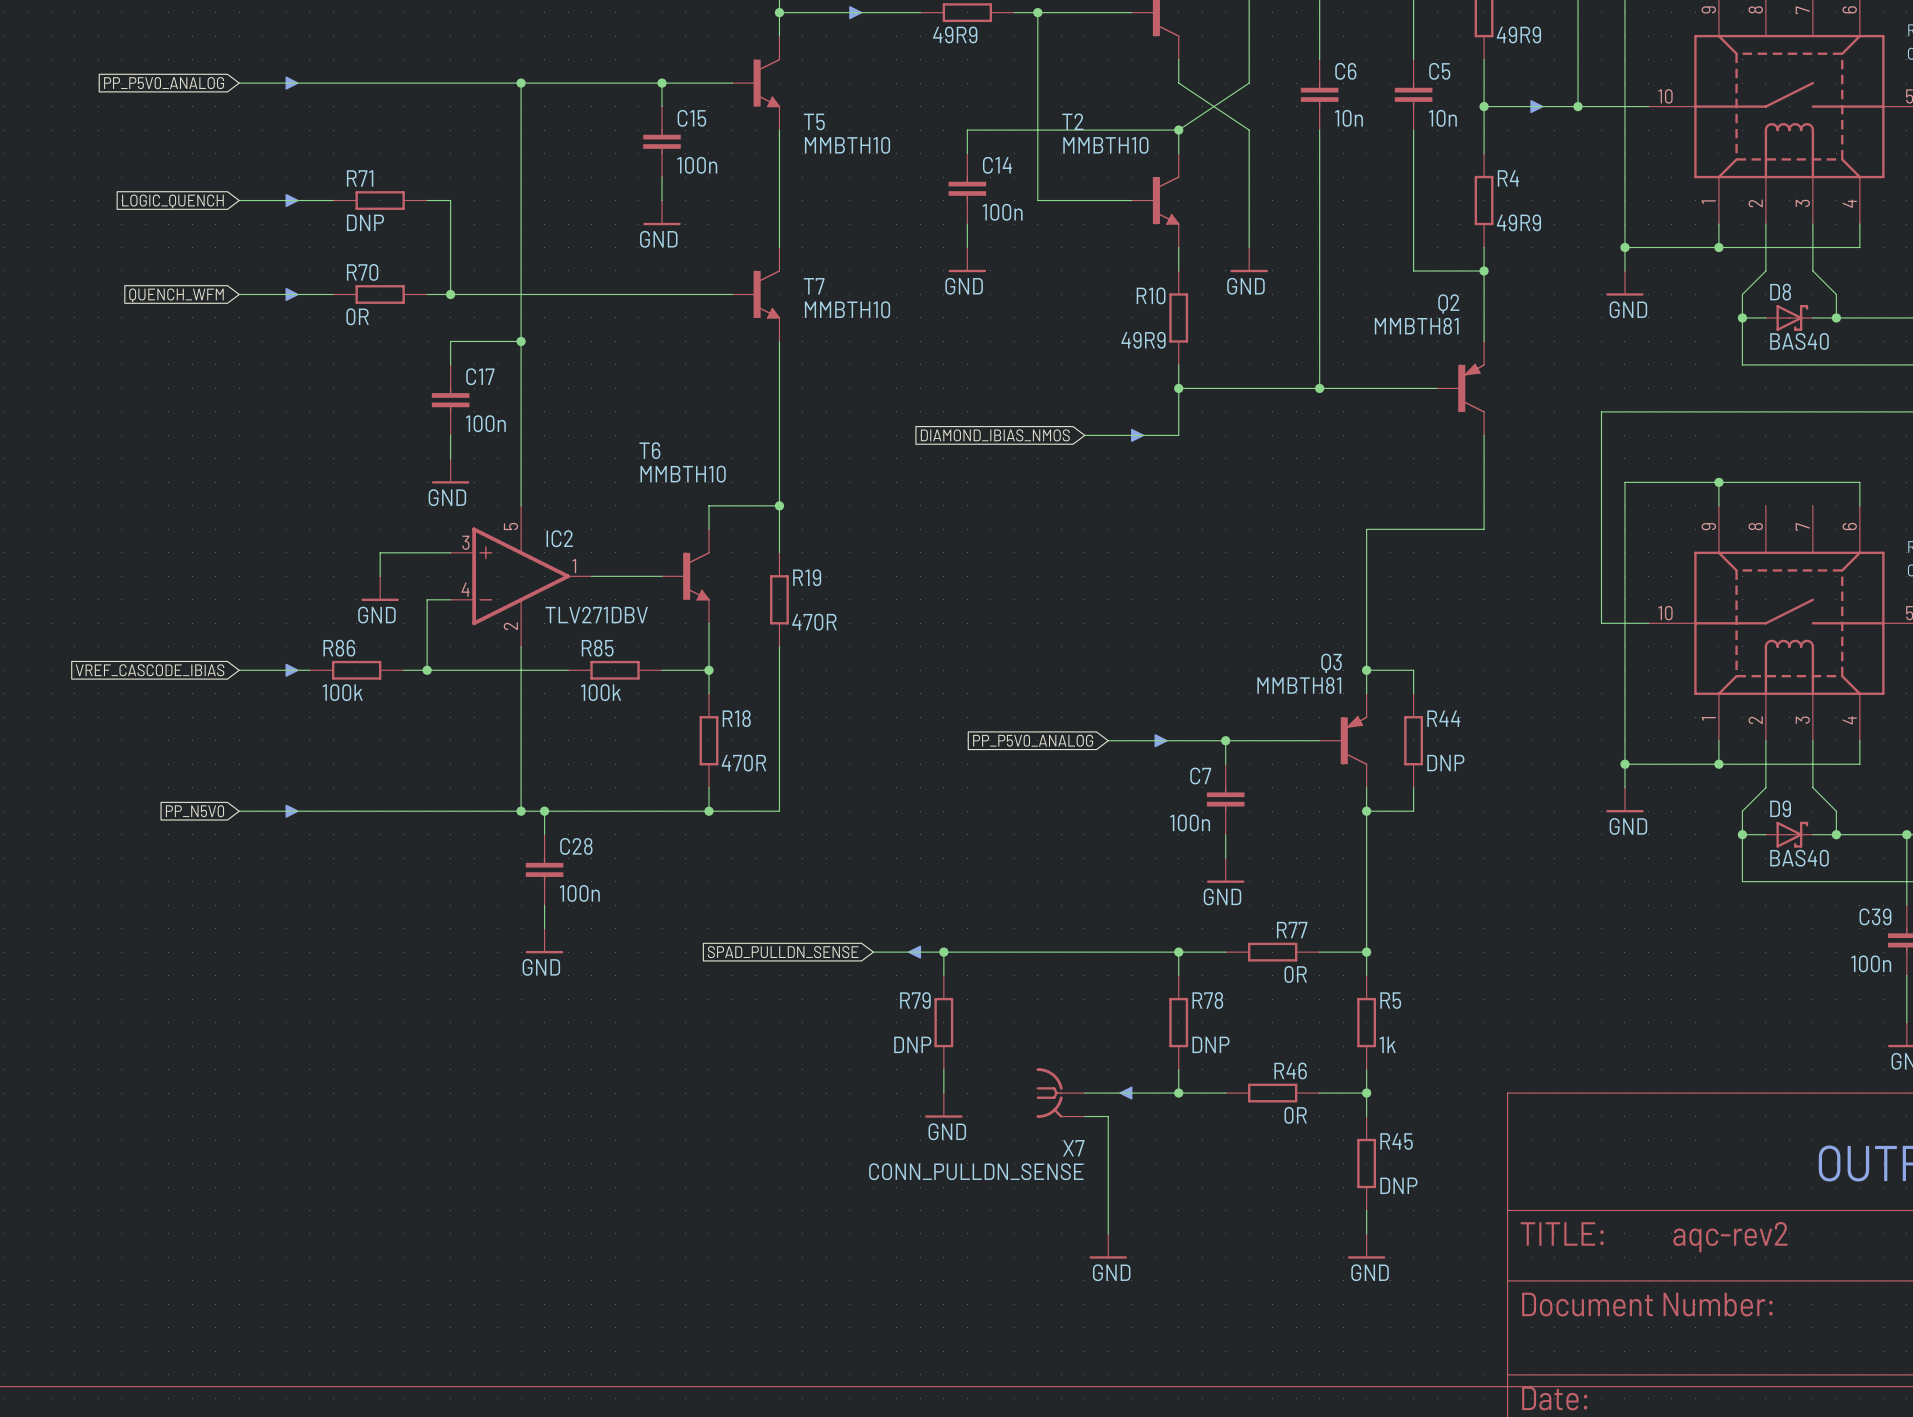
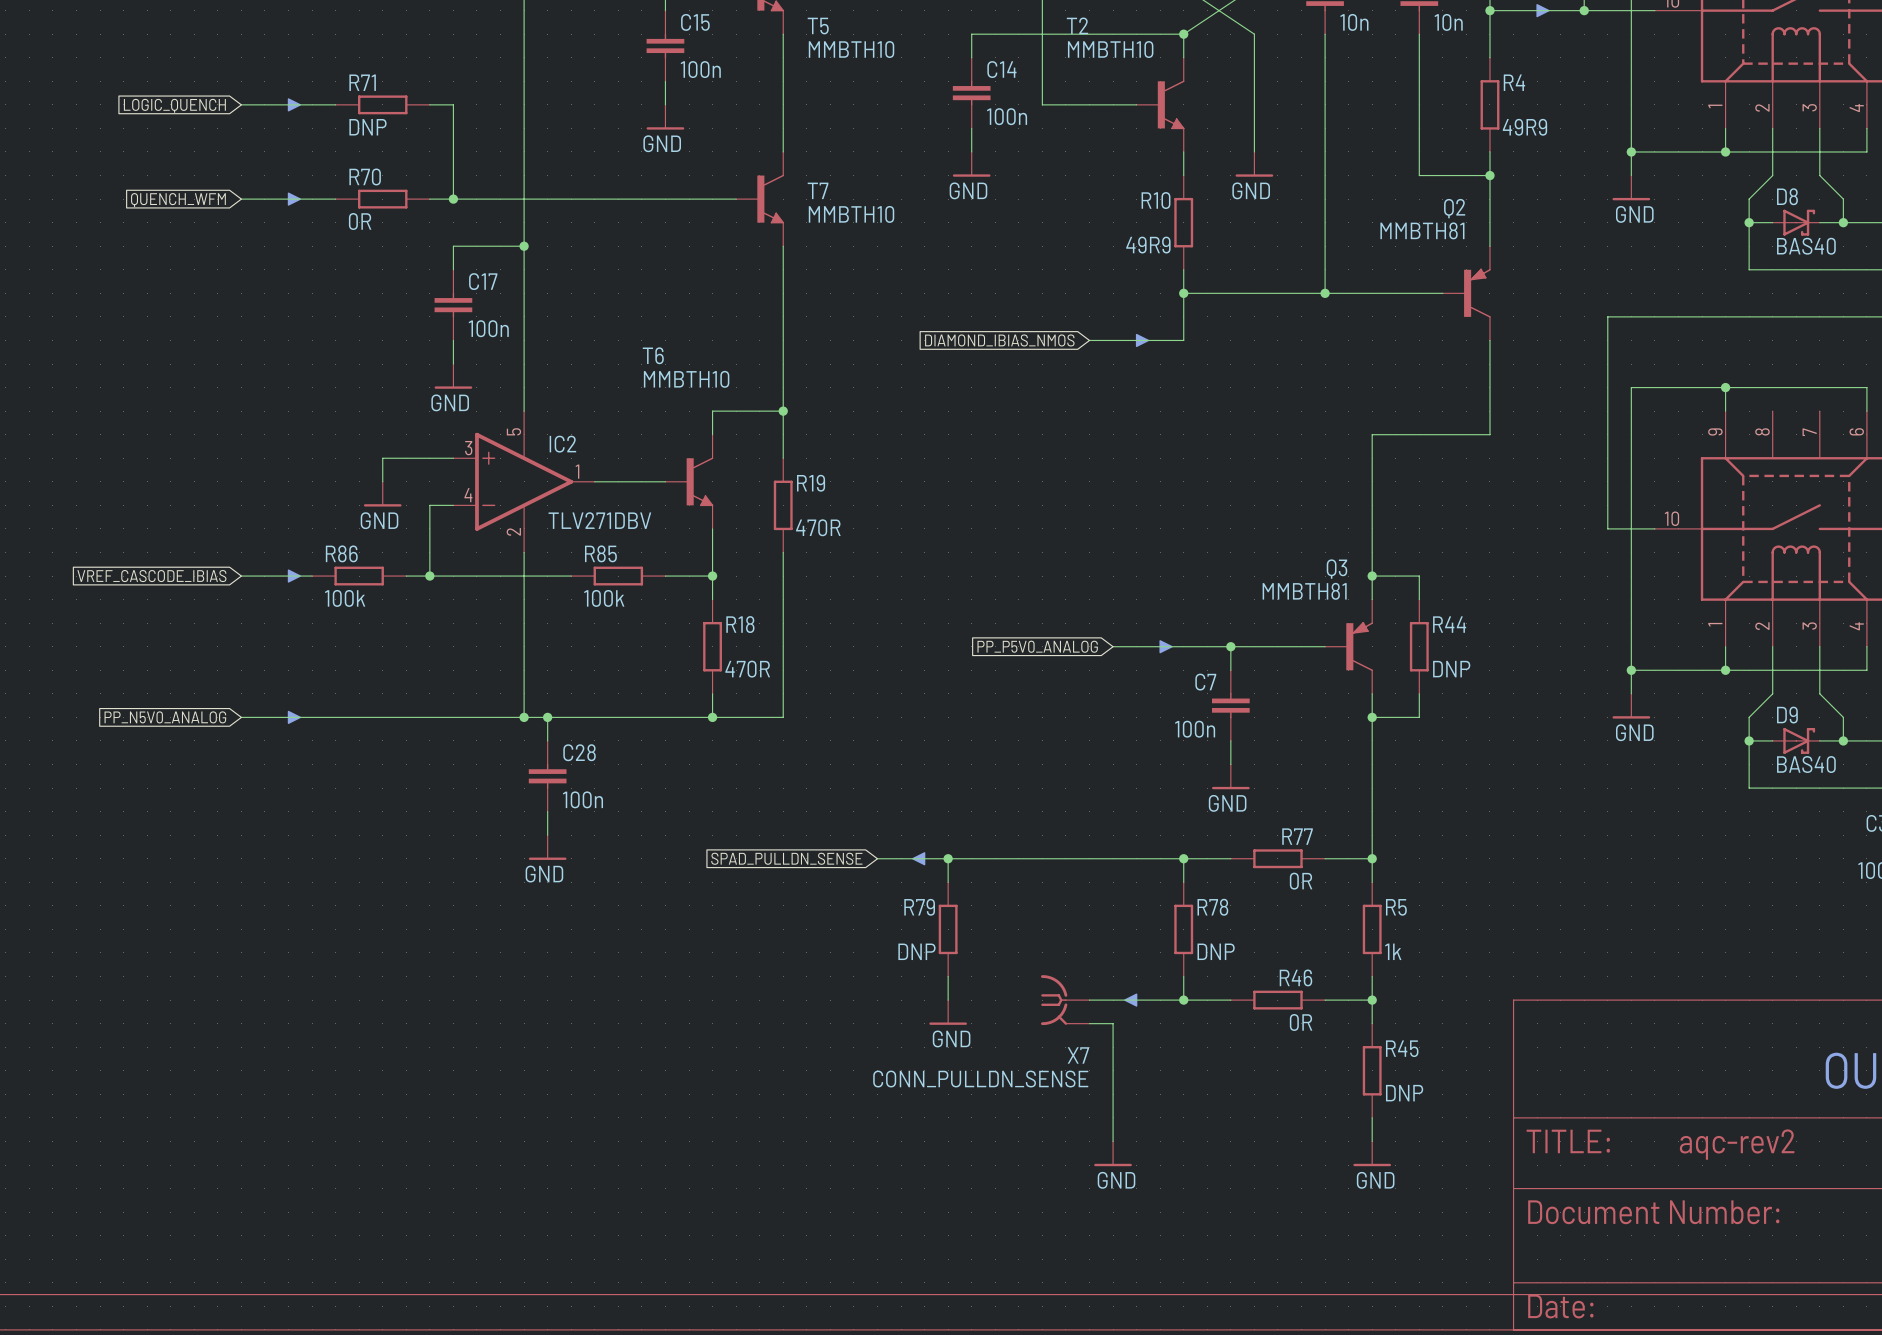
global label: PP_N5V0 (194, 811) -> PP_N5V0_ANALOG (165, 717)

